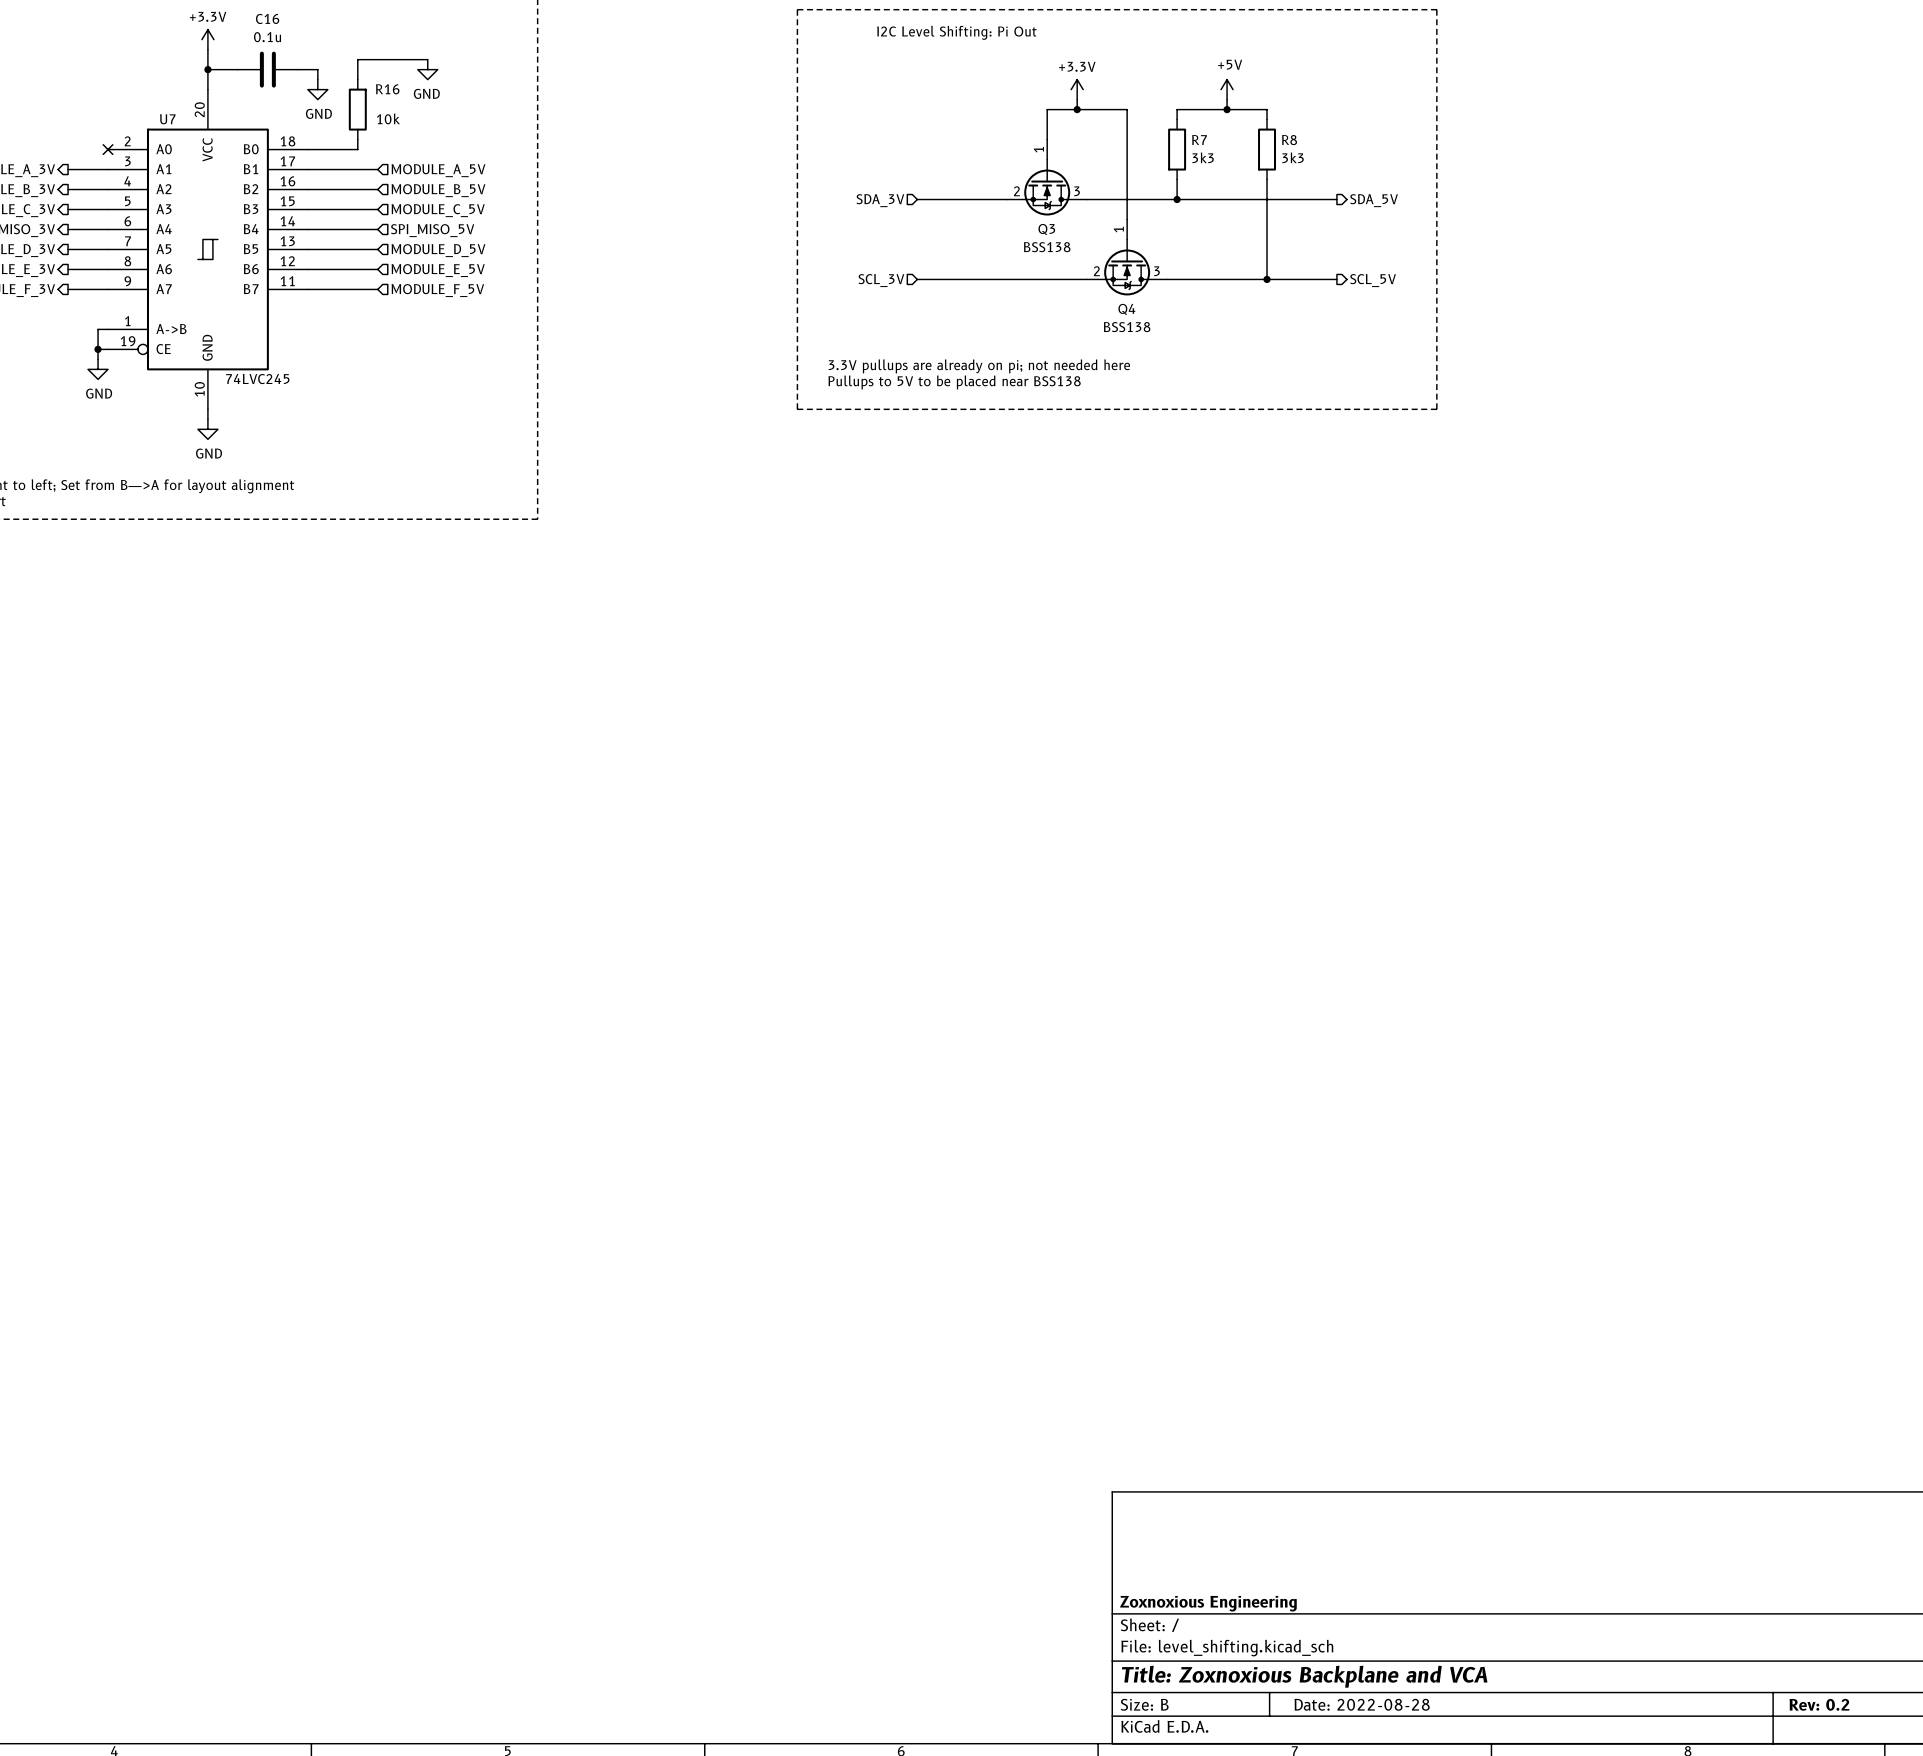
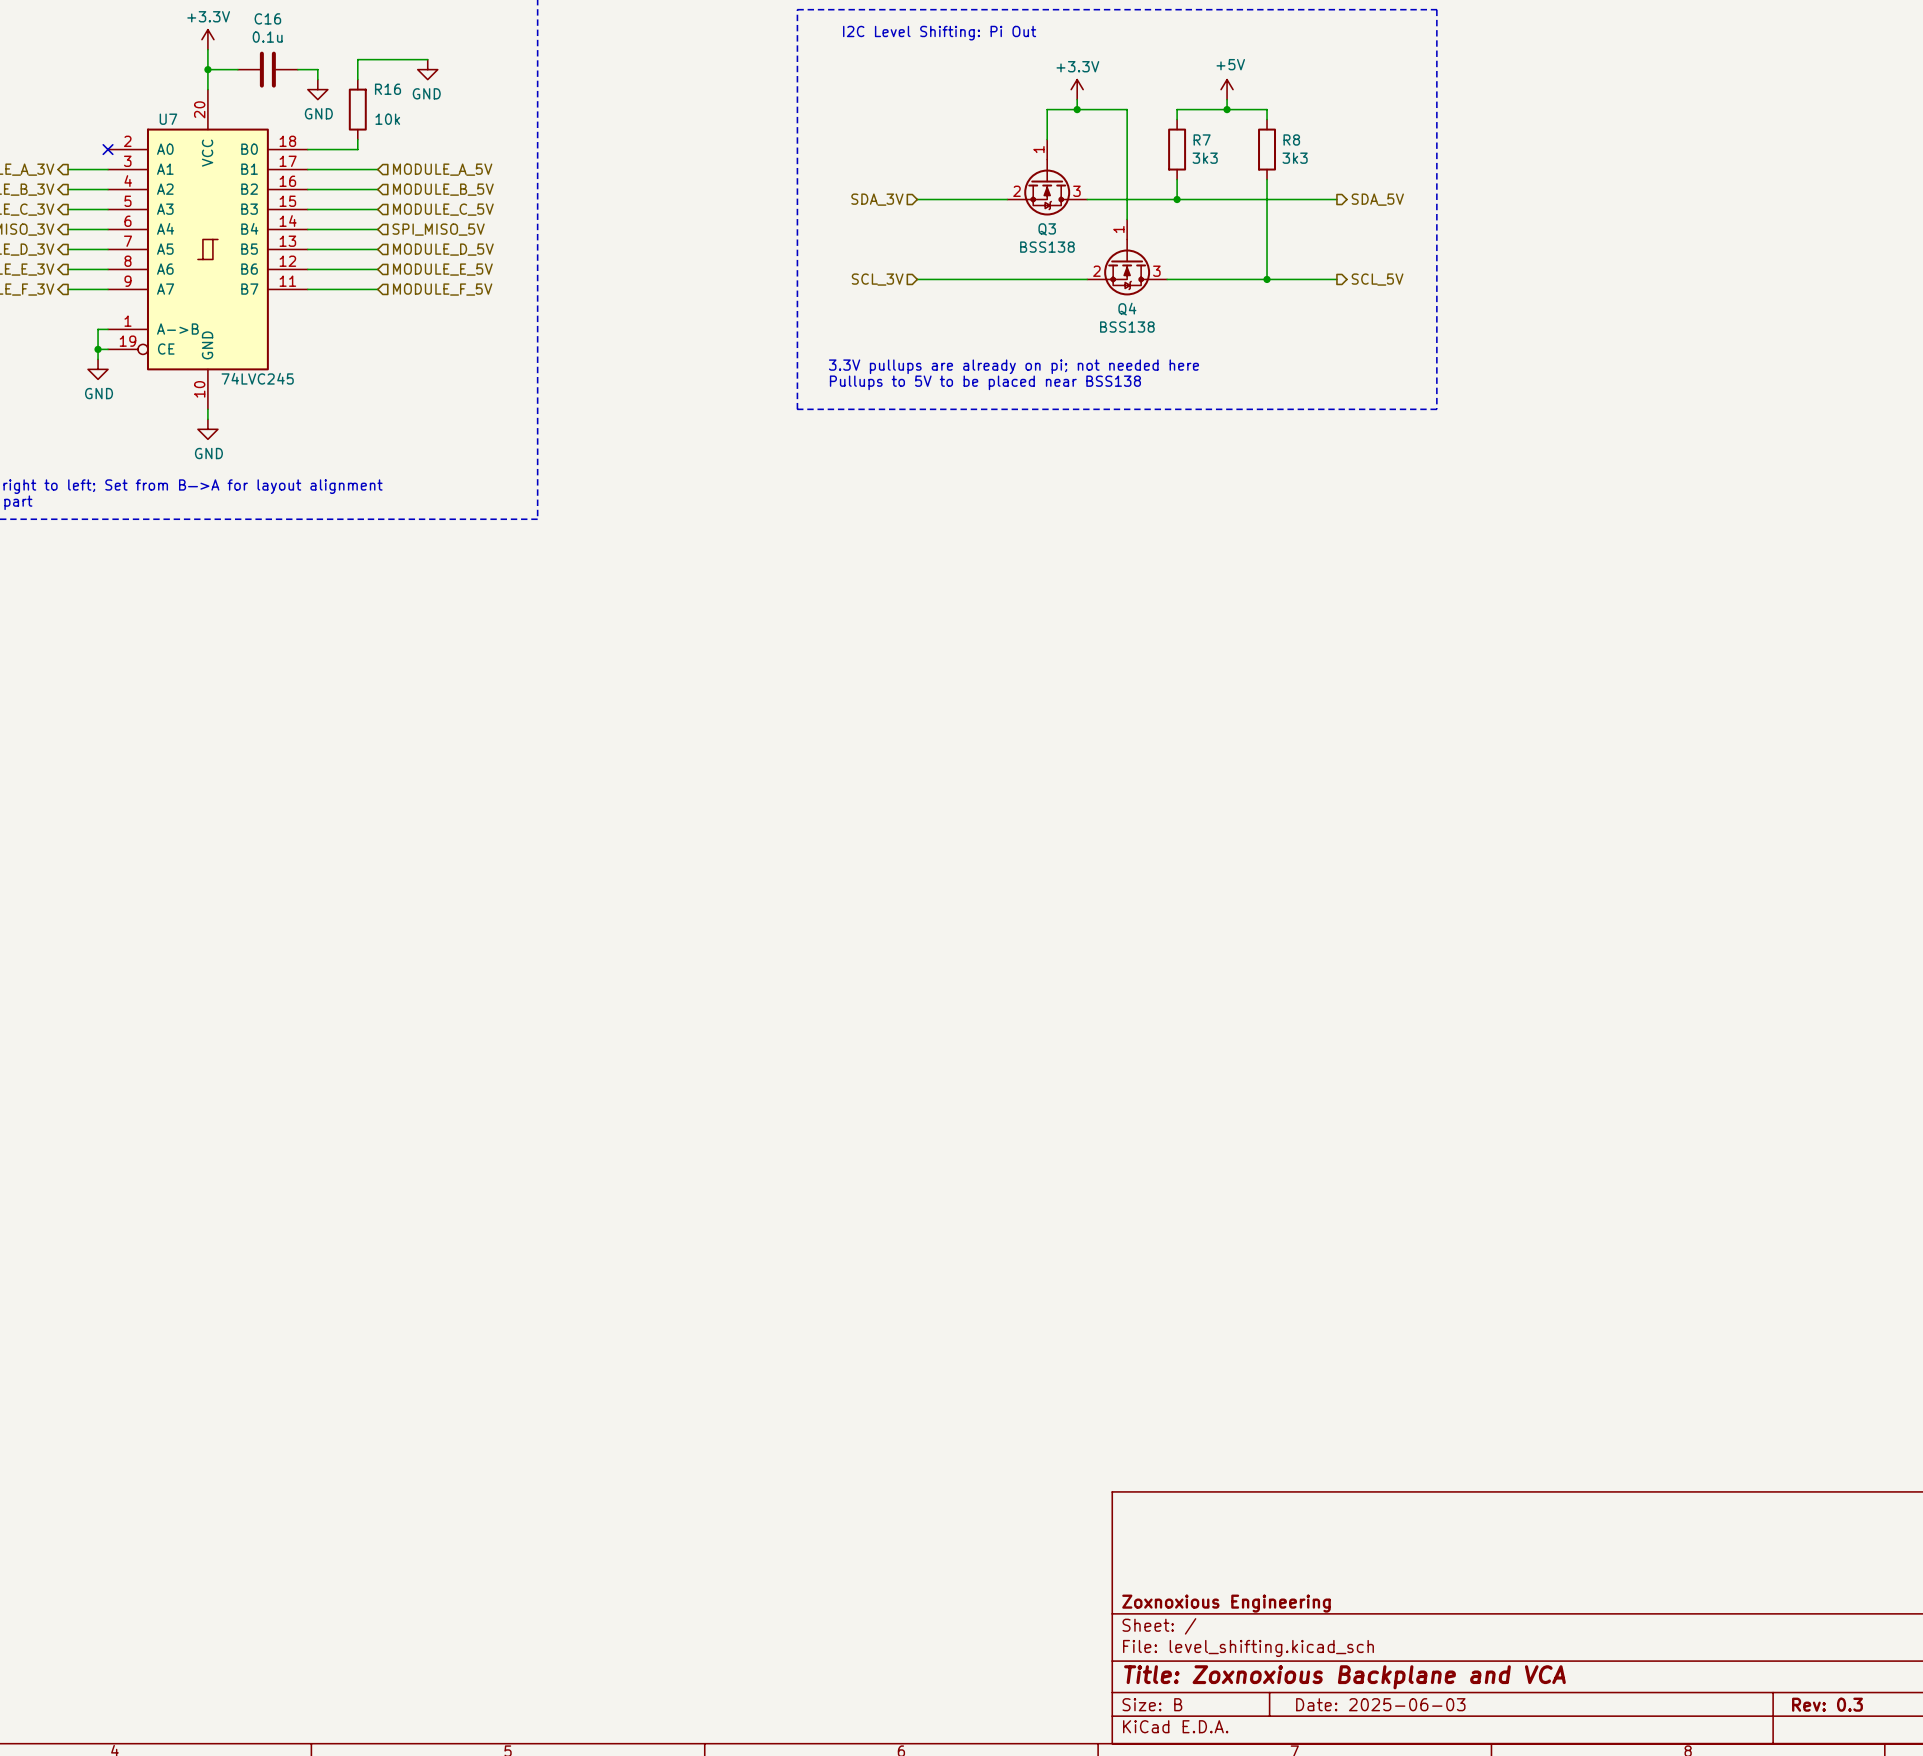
title block: Date: 2022-08-28 (1362, 1704) -> Date: 2025-06-03 (1380, 1704)
title block: Rev: 0.2 (1819, 1704) -> Rev: 0.3 (1827, 1704)

